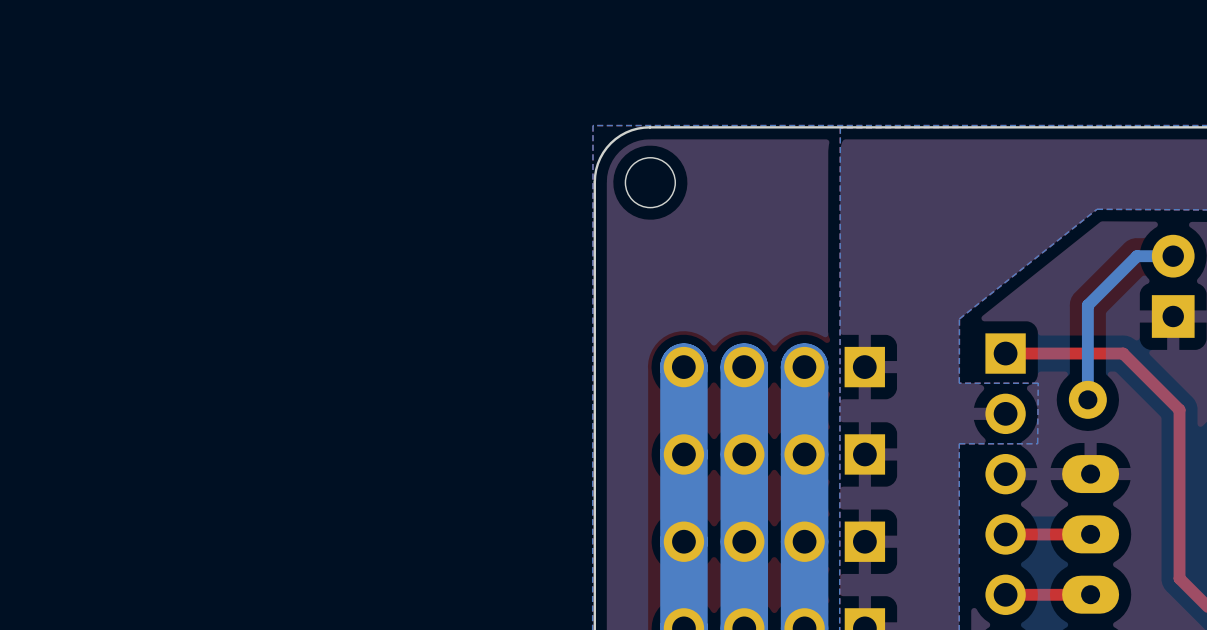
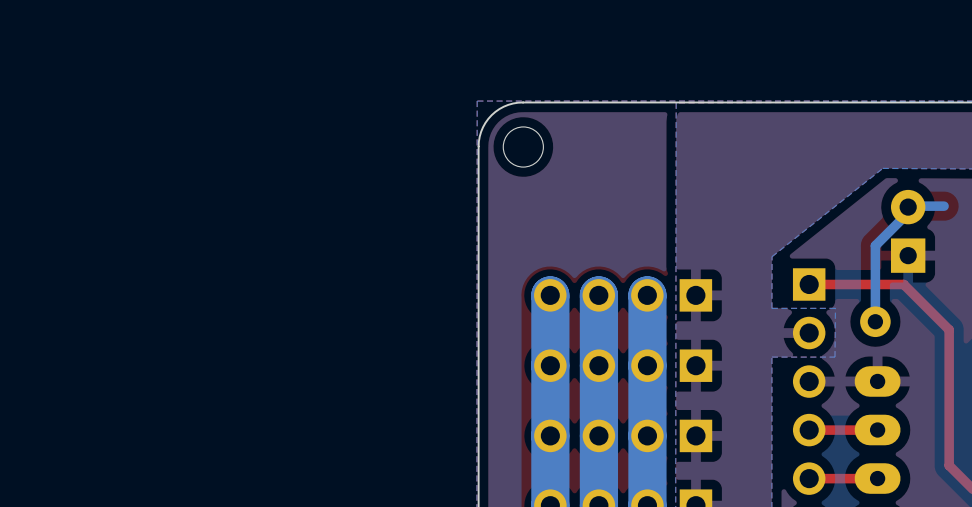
part position: (1173, 286) -> (908, 231)

